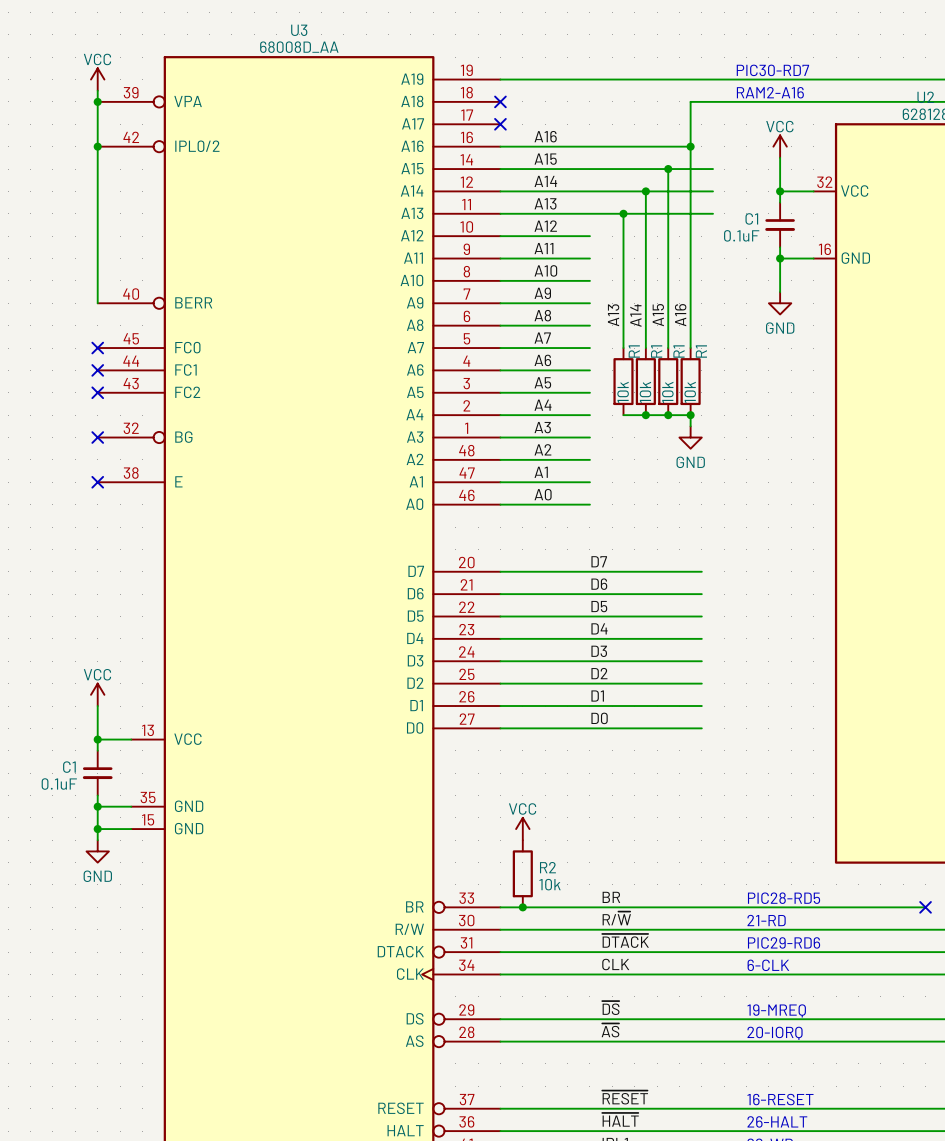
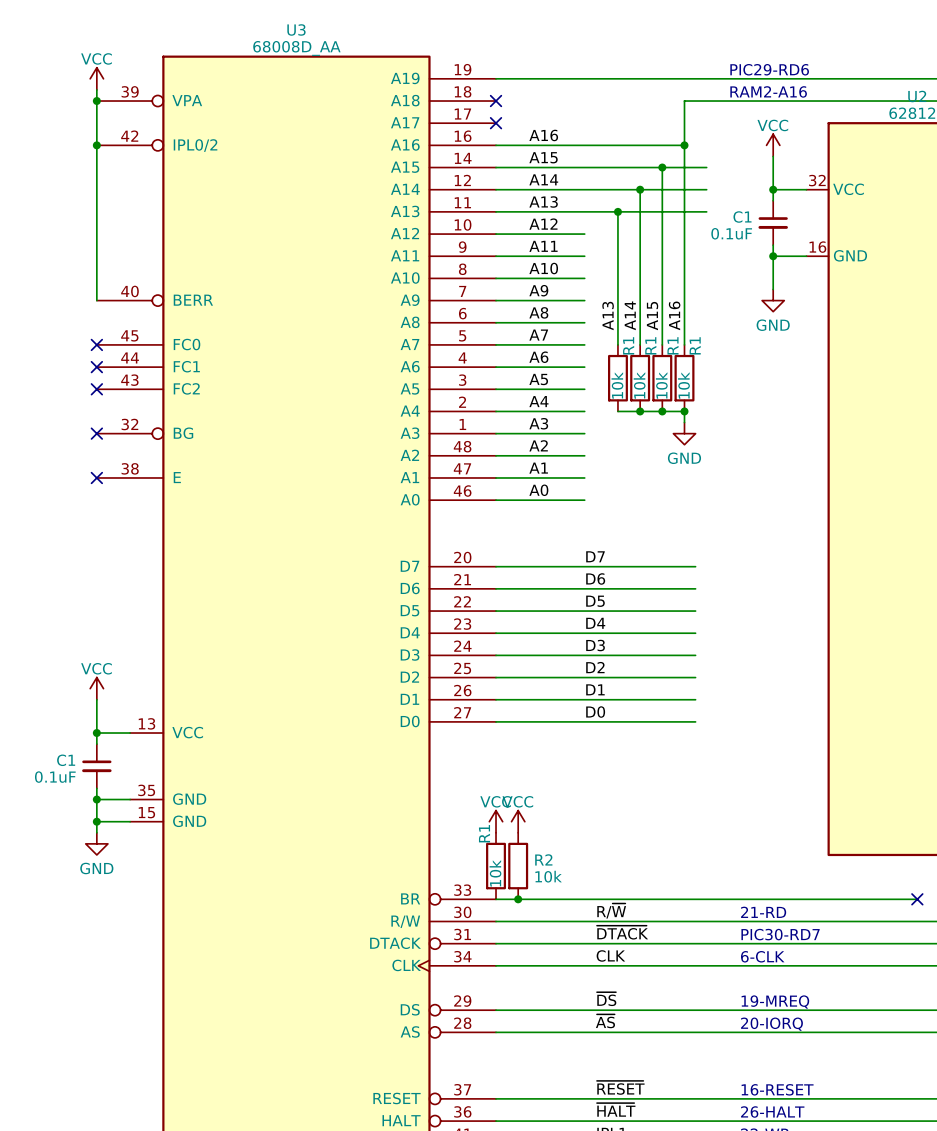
text: PIC30-RD7 (772, 70) -> PIC29-RD6 (769, 69)
power symbol: none -> VCC (496, 821)
R1: none -> 10k (496, 866)
label: BR (611, 897) -> none
text: PIC28-RD5 (784, 898) -> none
text: PIC29-RD6 (784, 942) -> PIC30-RD7 (780, 934)

